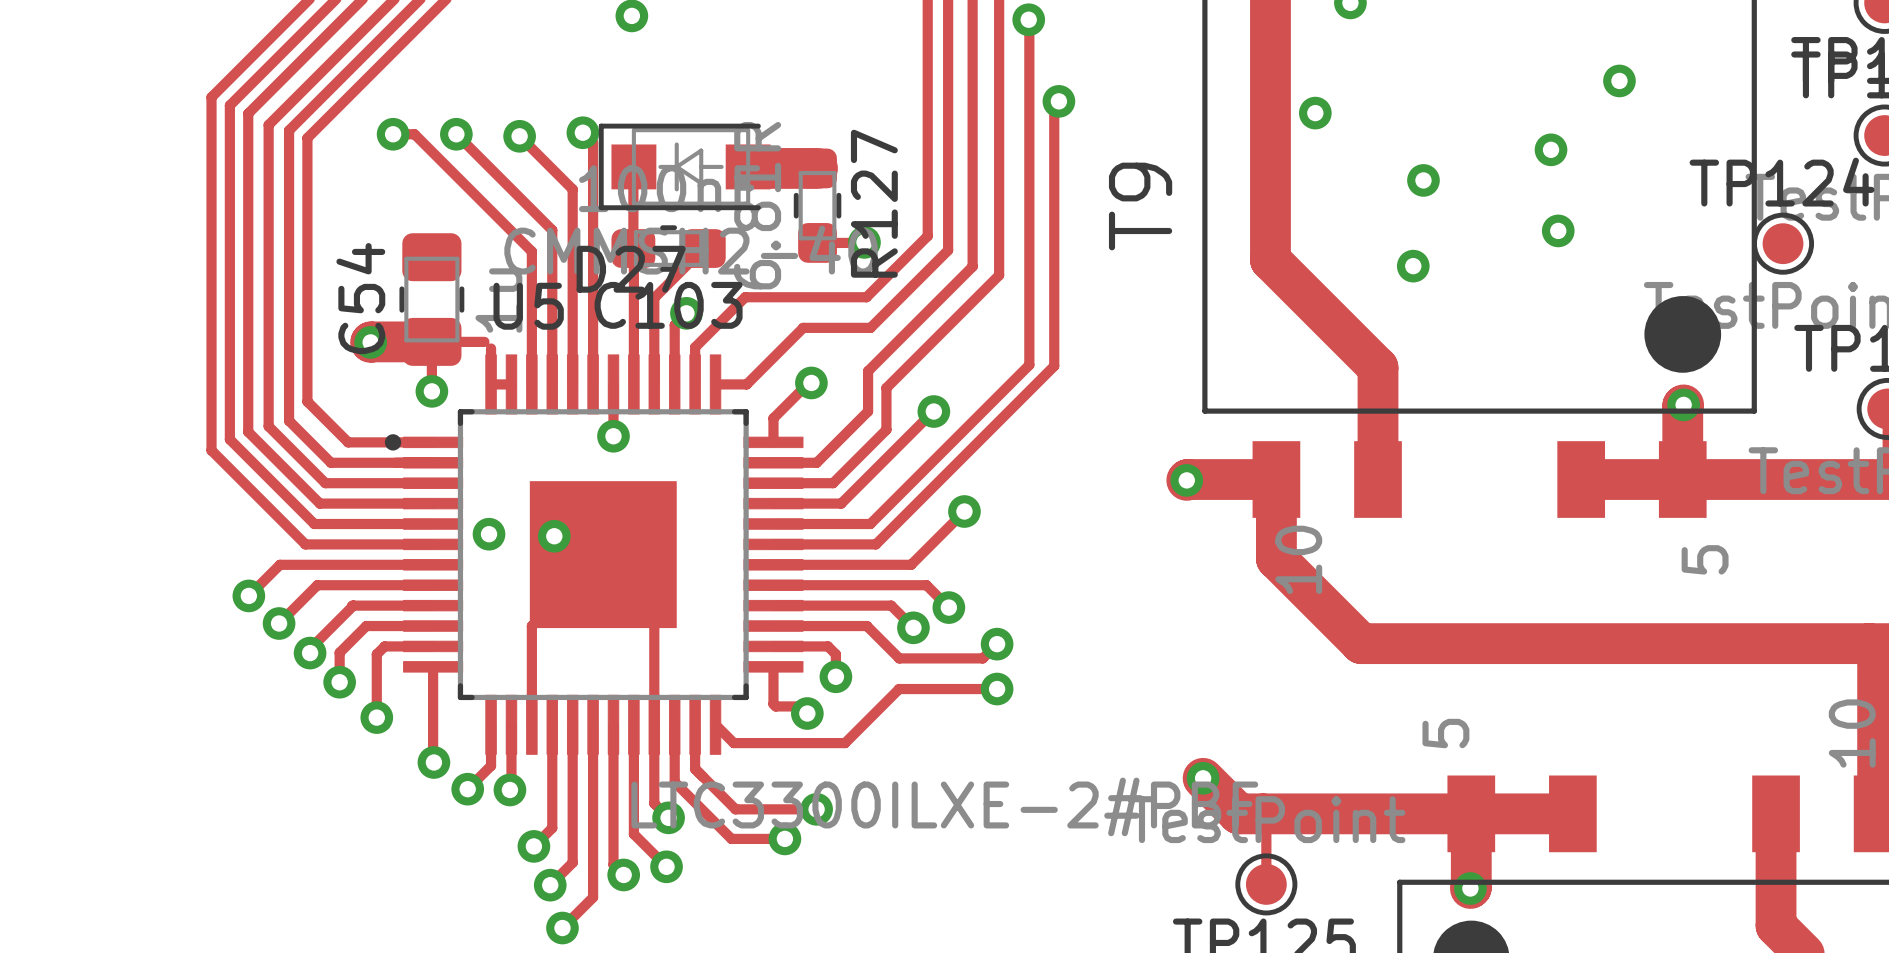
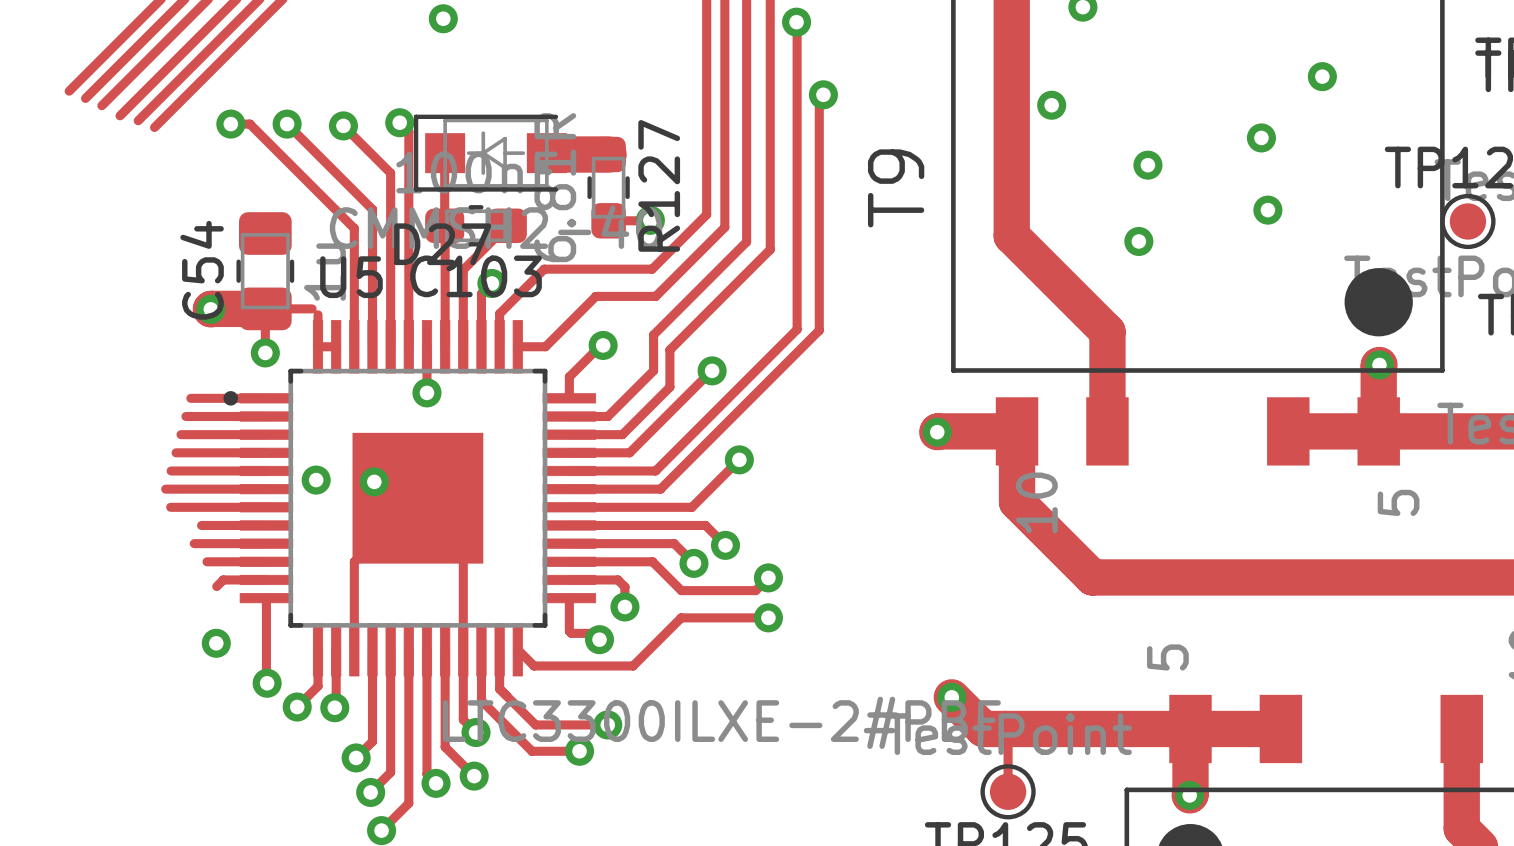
track: (211, 97) (211, 450) (305, 544) (319, 544) -> none
track: (229, 105) (229, 439) (314, 524) (326, 524) -> none
track: (248, 113) (248, 431) (319, 503) (331, 503) -> none
track: (268, 124) (268, 426) (325, 483) (337, 483) -> none
track: (289, 130) (289, 420) (330, 462) (342, 462) -> none
track: (307, 138) (307, 401) (348, 442) -> none
track: (325, 564) (279, 564) (248, 595) -> none
track: (360, 585) (317, 585) (279, 623) -> none
via: (248, 595) -> none
track: (353, 605) (310, 648) (310, 653) -> none
via: (279, 623) -> none
track: (366, 626) (339, 652) (339, 682) -> none
via: (310, 653) -> none
track: (376, 654) (376, 717) -> none
via: (339, 682) -> none

